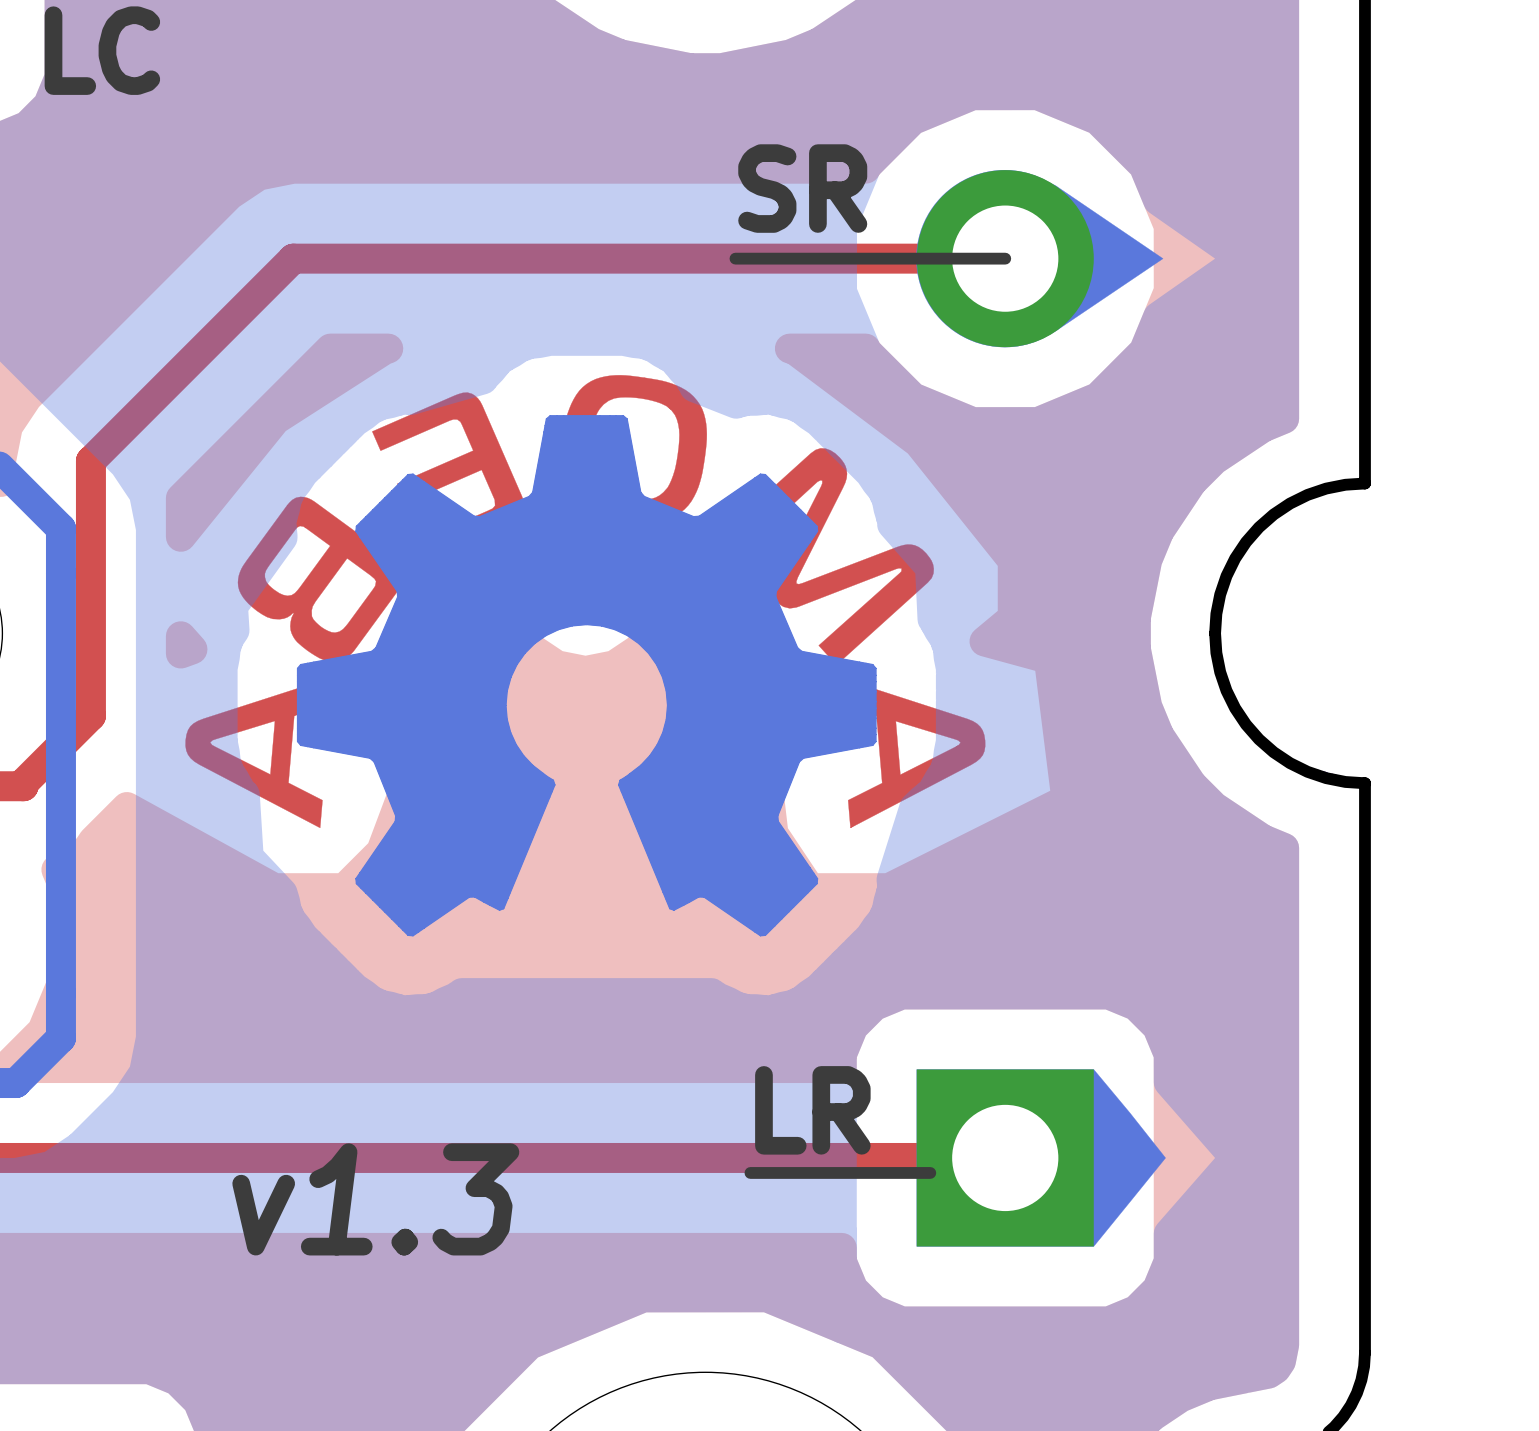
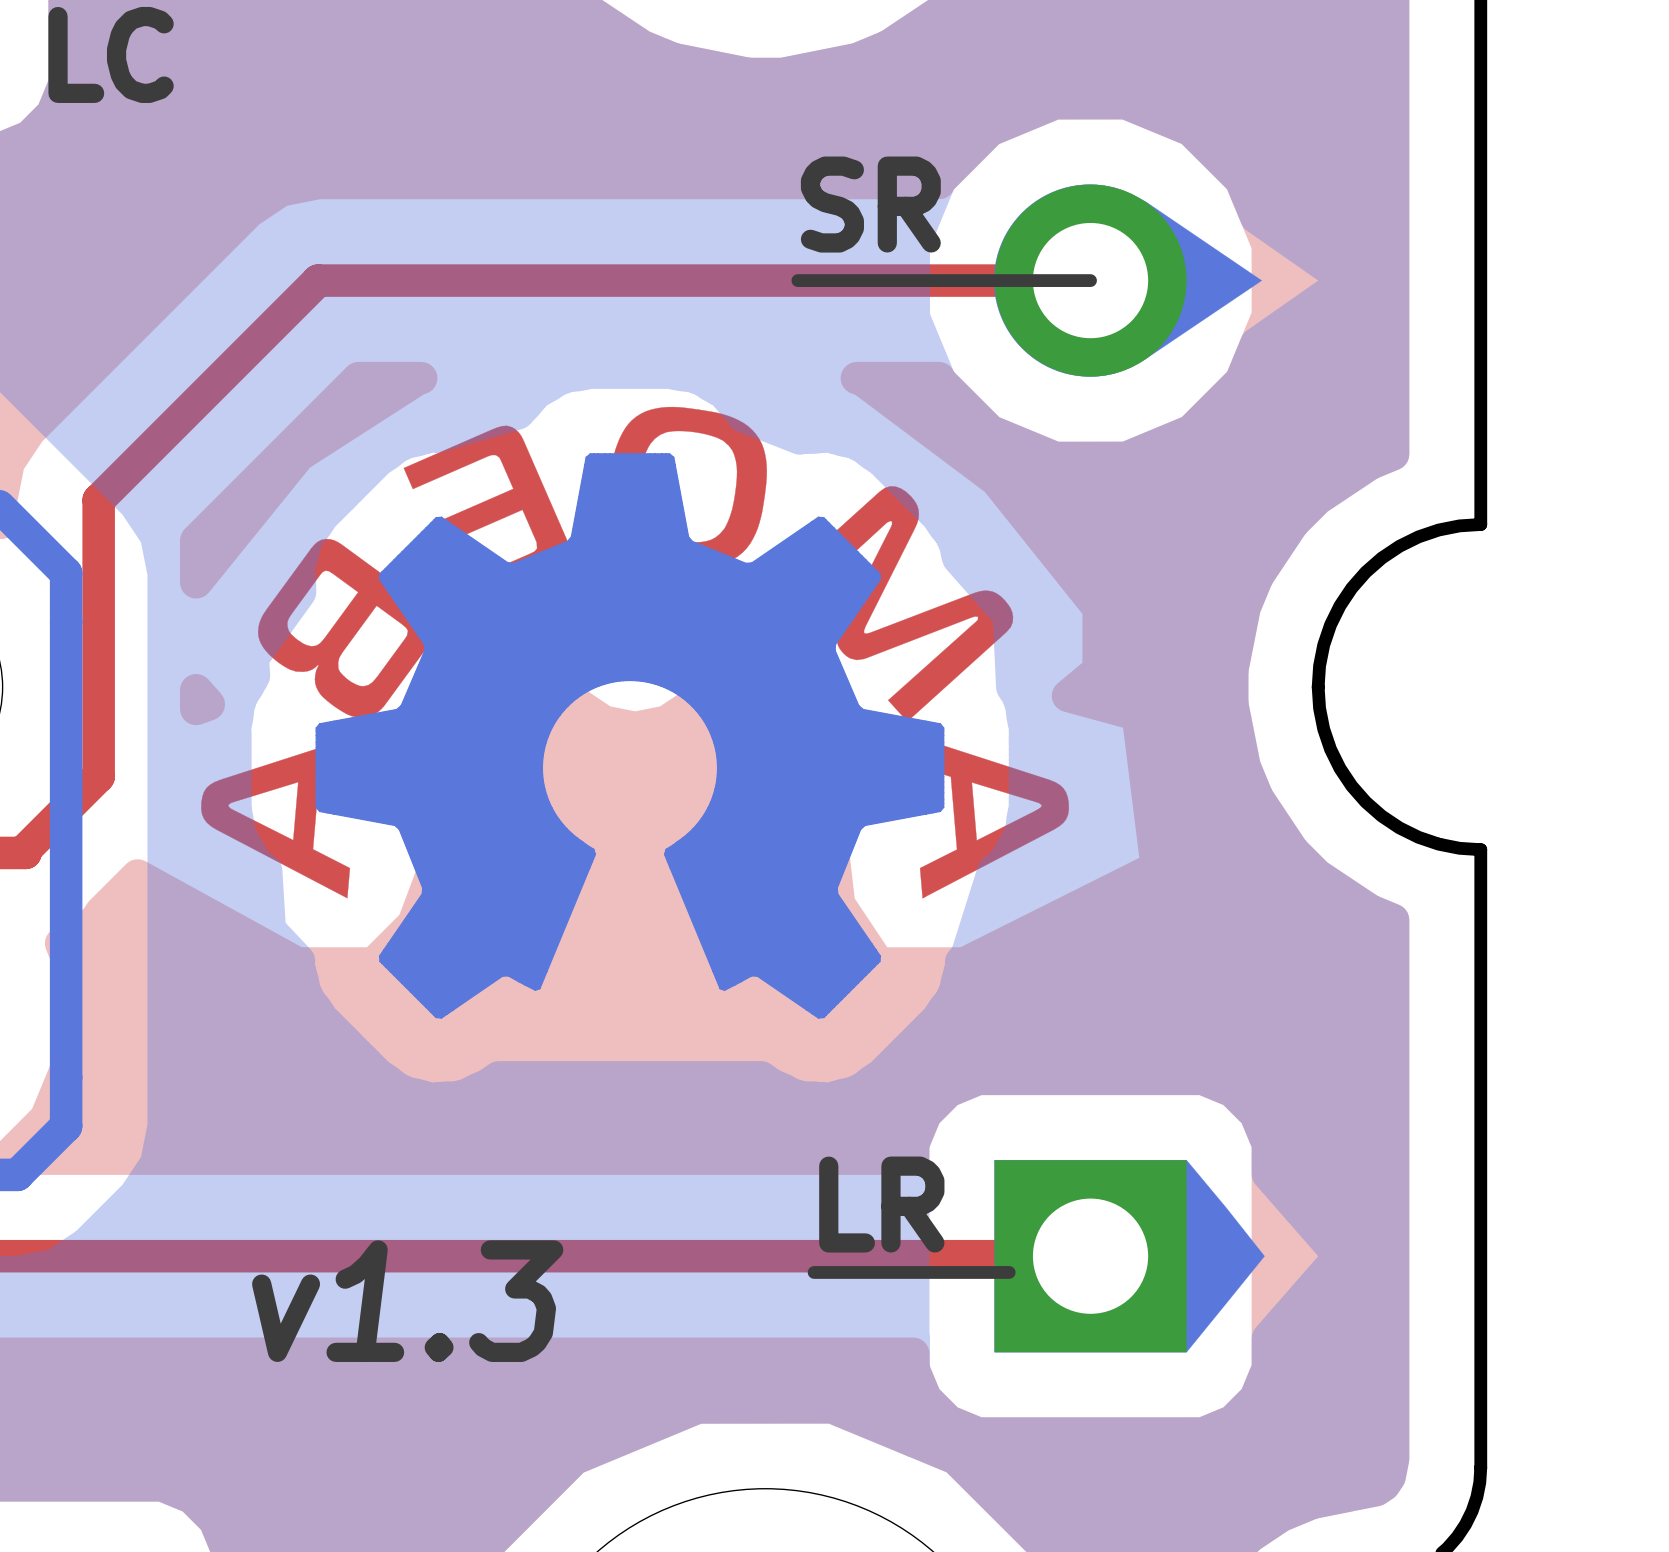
drawing shape: [297, 415, 877, 936] -> [316, 453, 944, 1019]

